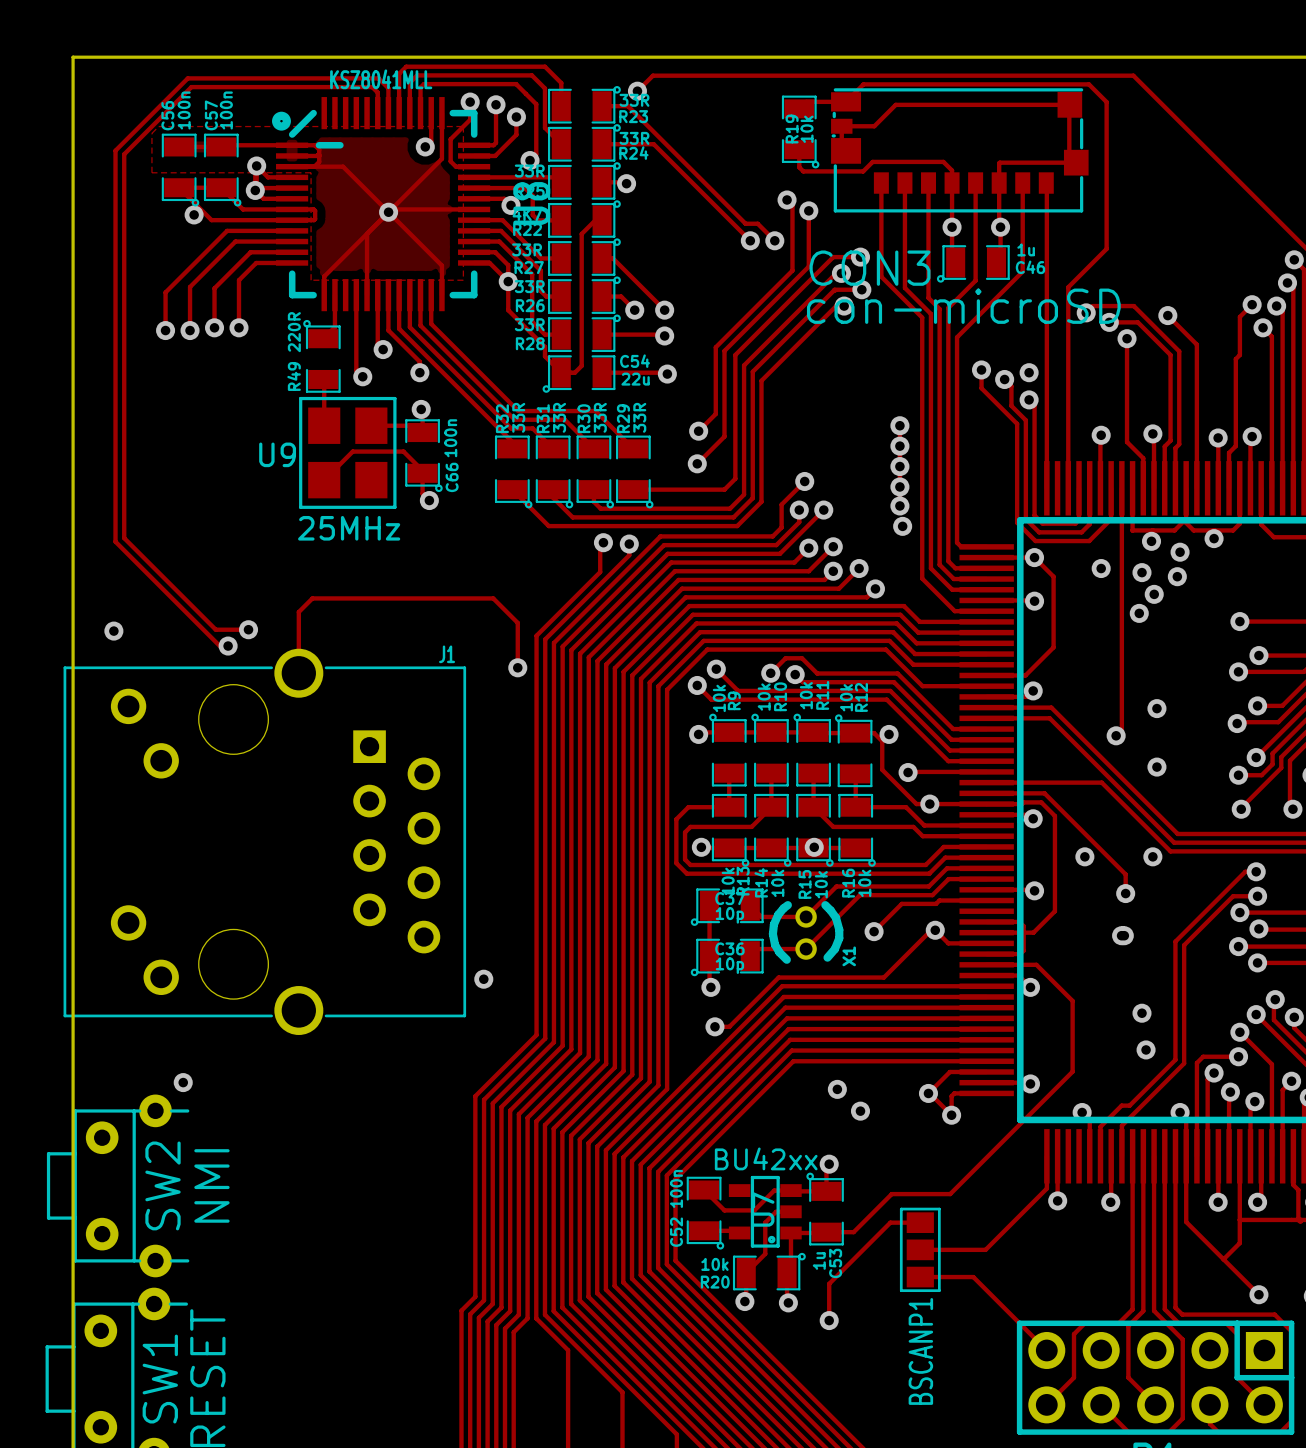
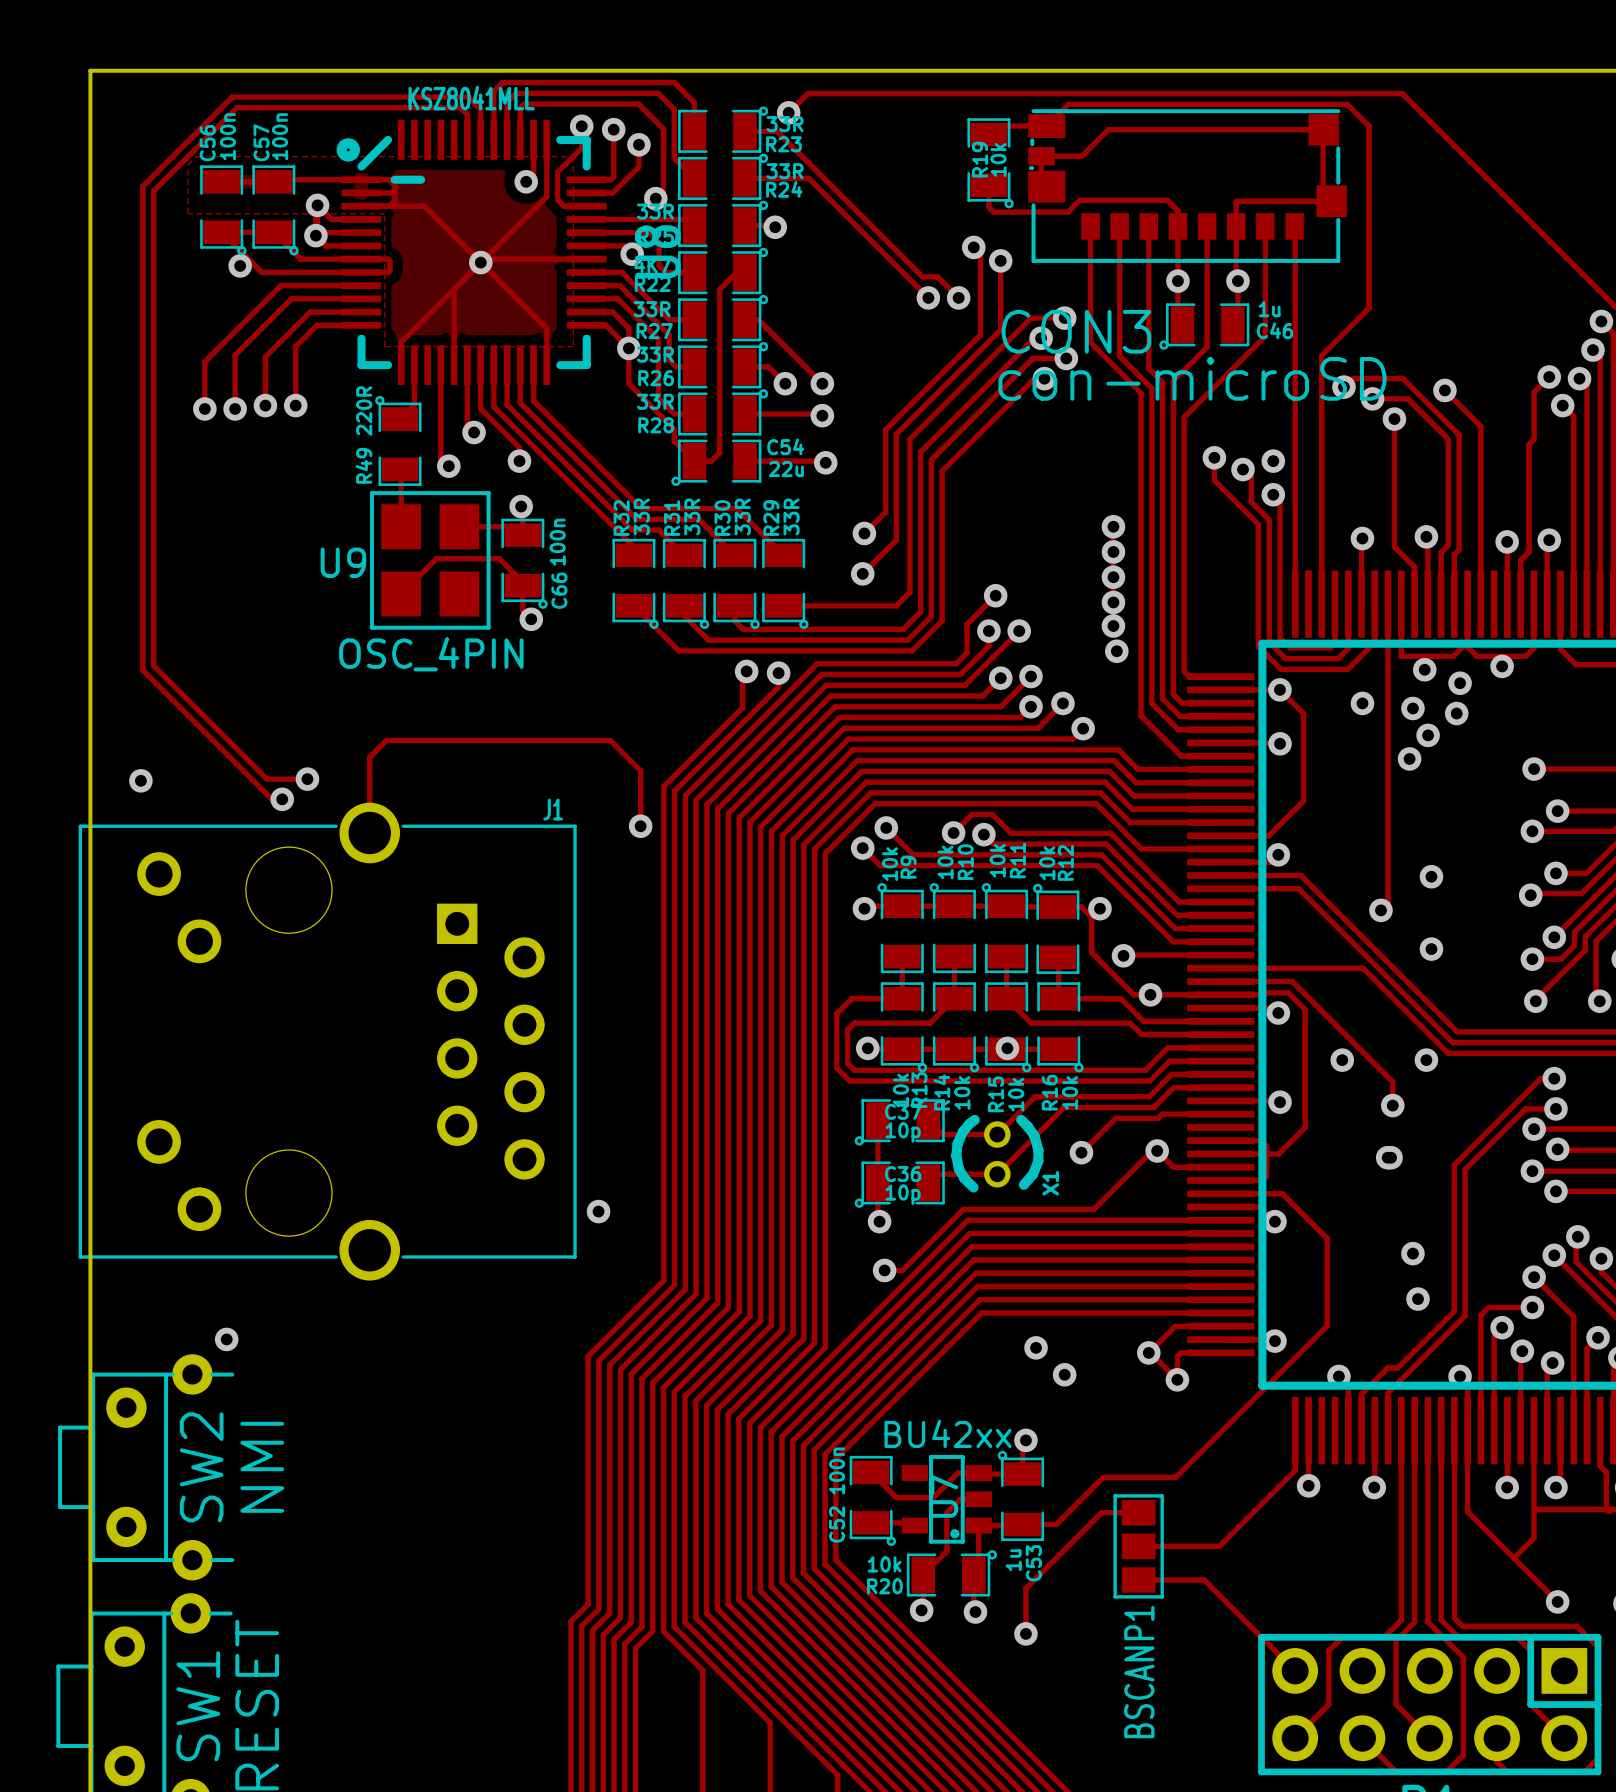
U9 value: 25MHz (349, 528) -> OSC_4PIN (431, 654)

